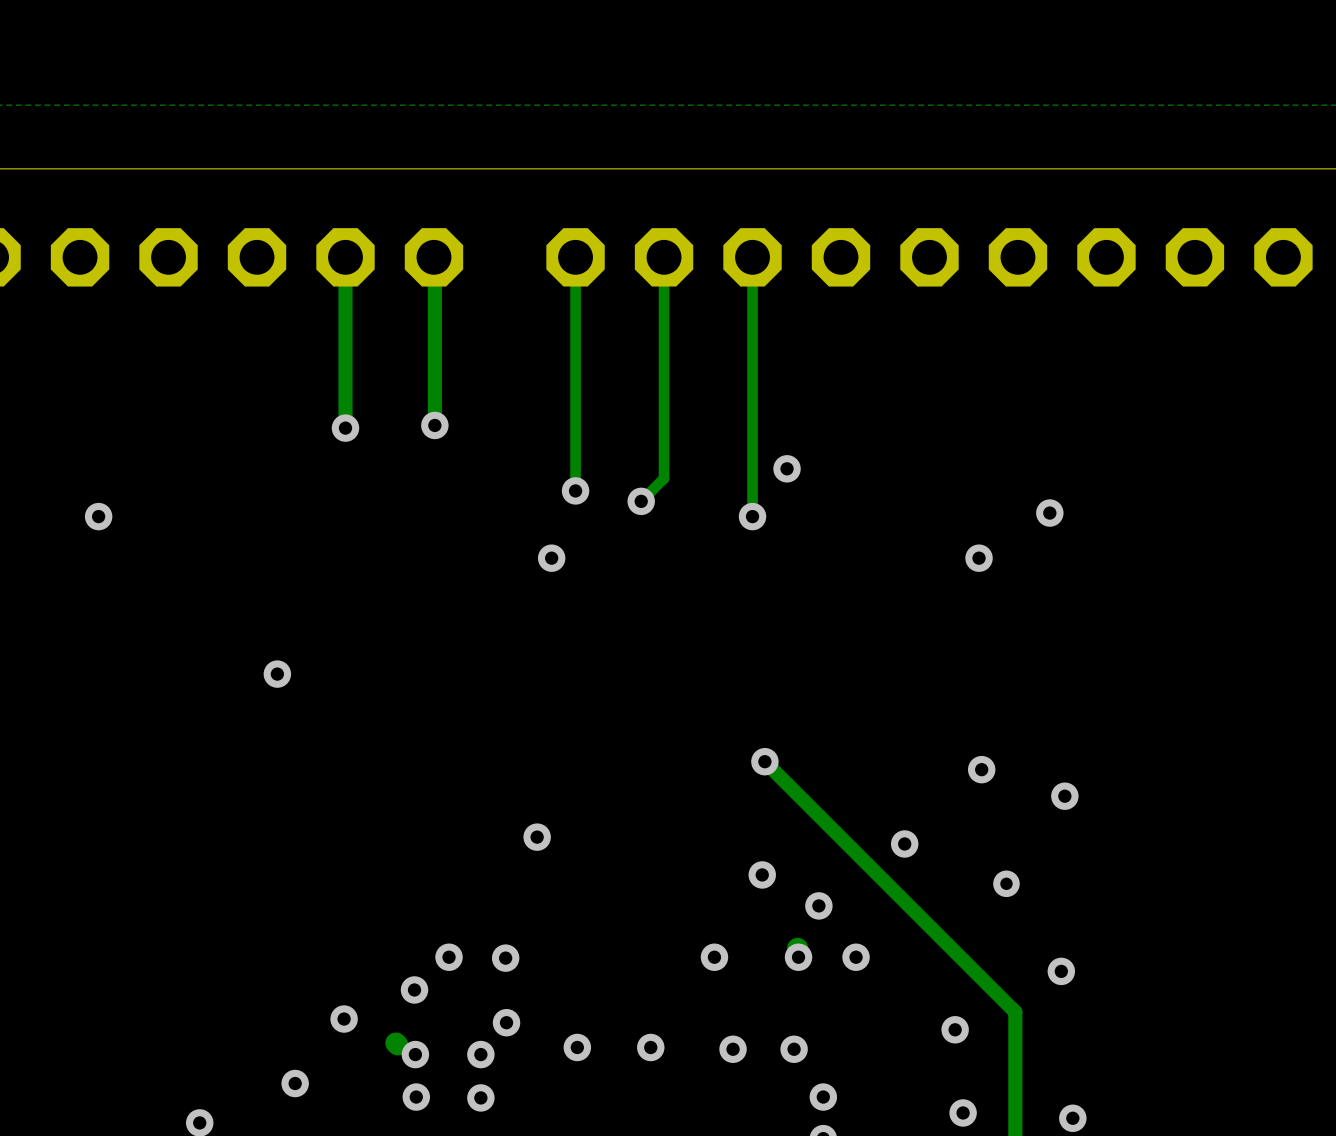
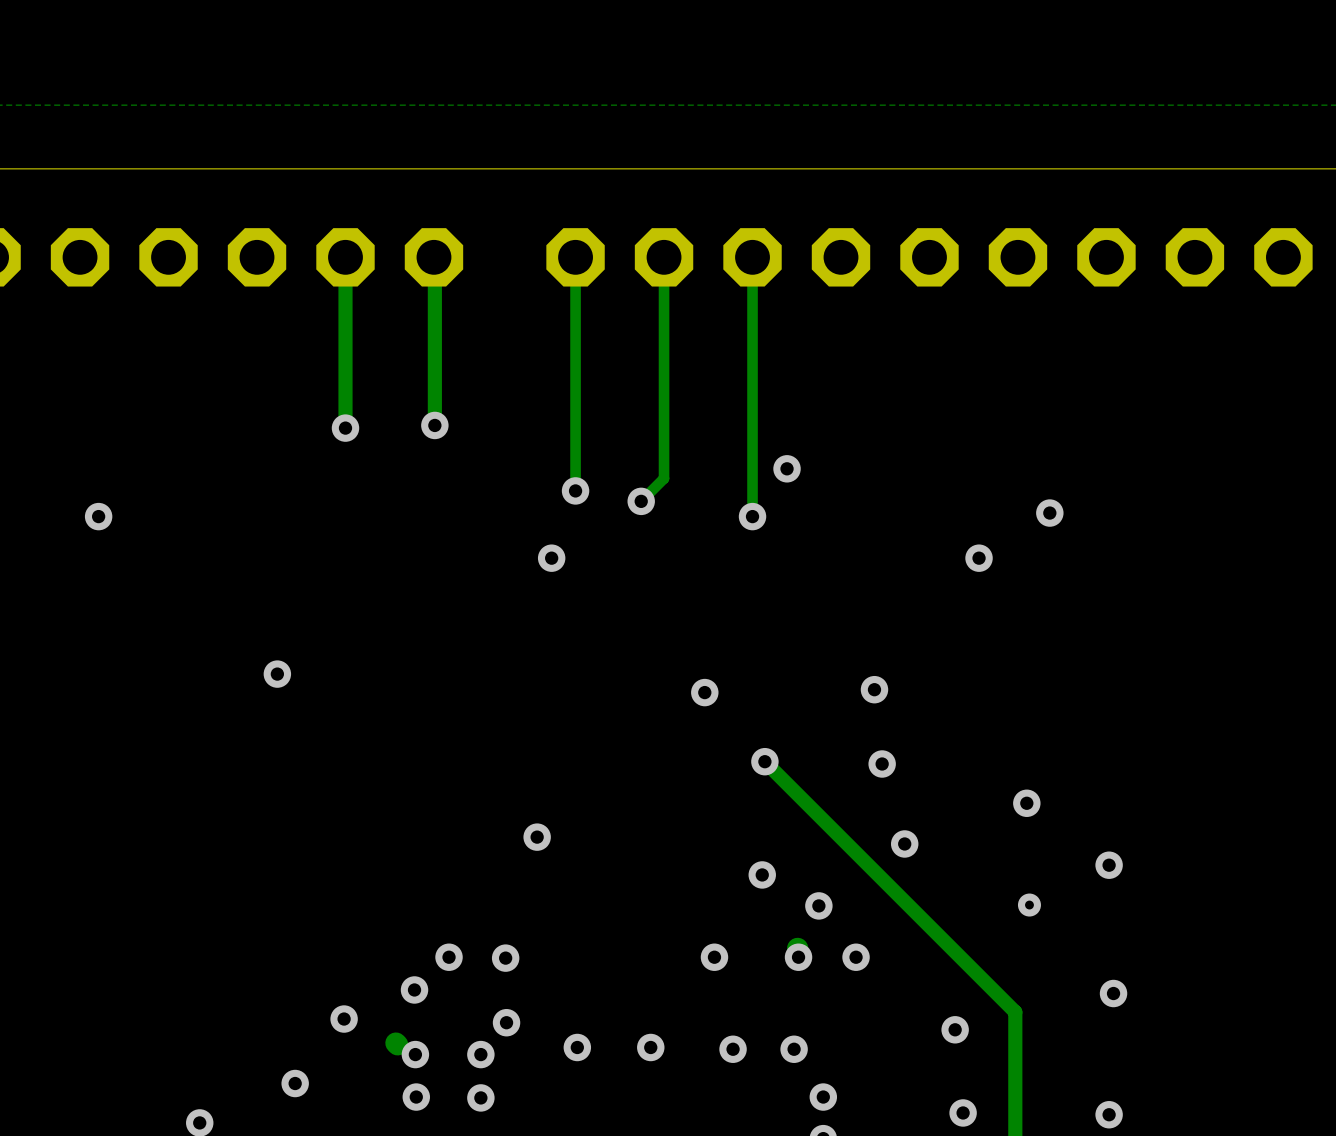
via: none -> (874, 689)
via: none -> (704, 692)
via: none -> (882, 764)
via: (981, 769) -> none
via: (1064, 796) -> none
via: none -> (1026, 803)
via: none -> (1109, 865)
via position: (1006, 883) -> (1029, 905)
via position: (1061, 971) -> (1113, 993)
via position: (1072, 1118) -> (1109, 1114)

